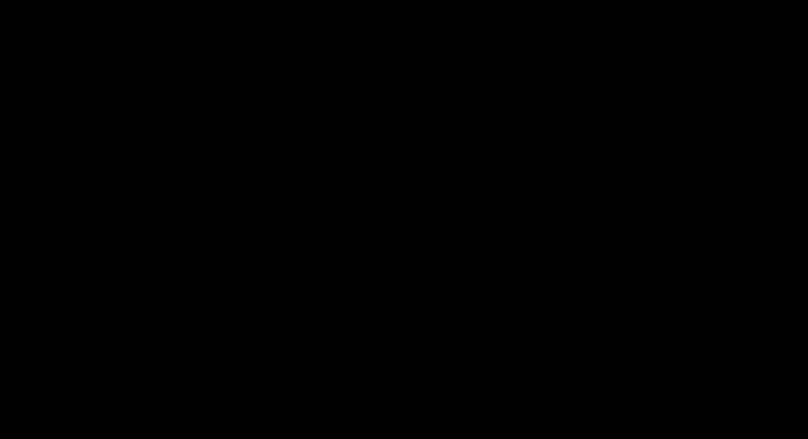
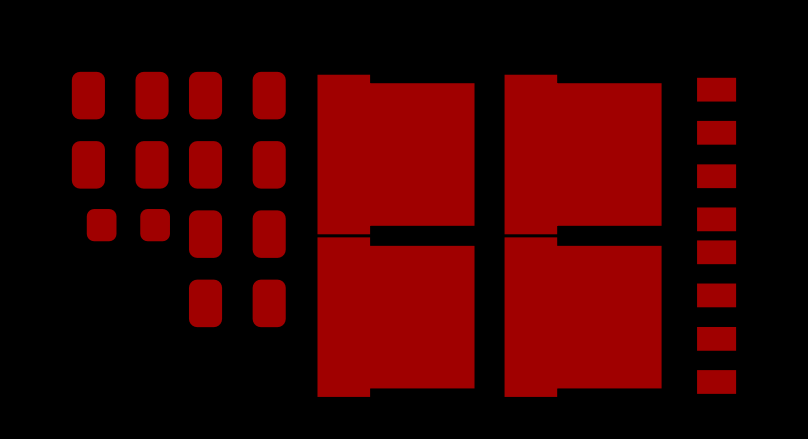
part: none -> (120, 95)
part: none -> (237, 95)
part: none -> (433, 154)
part: none -> (620, 154)
part: none -> (120, 164)
part: none -> (237, 164)
part: none -> (128, 225)
part: none -> (237, 234)
part: none -> (237, 303)
part: none -> (433, 317)
part: none -> (620, 317)

